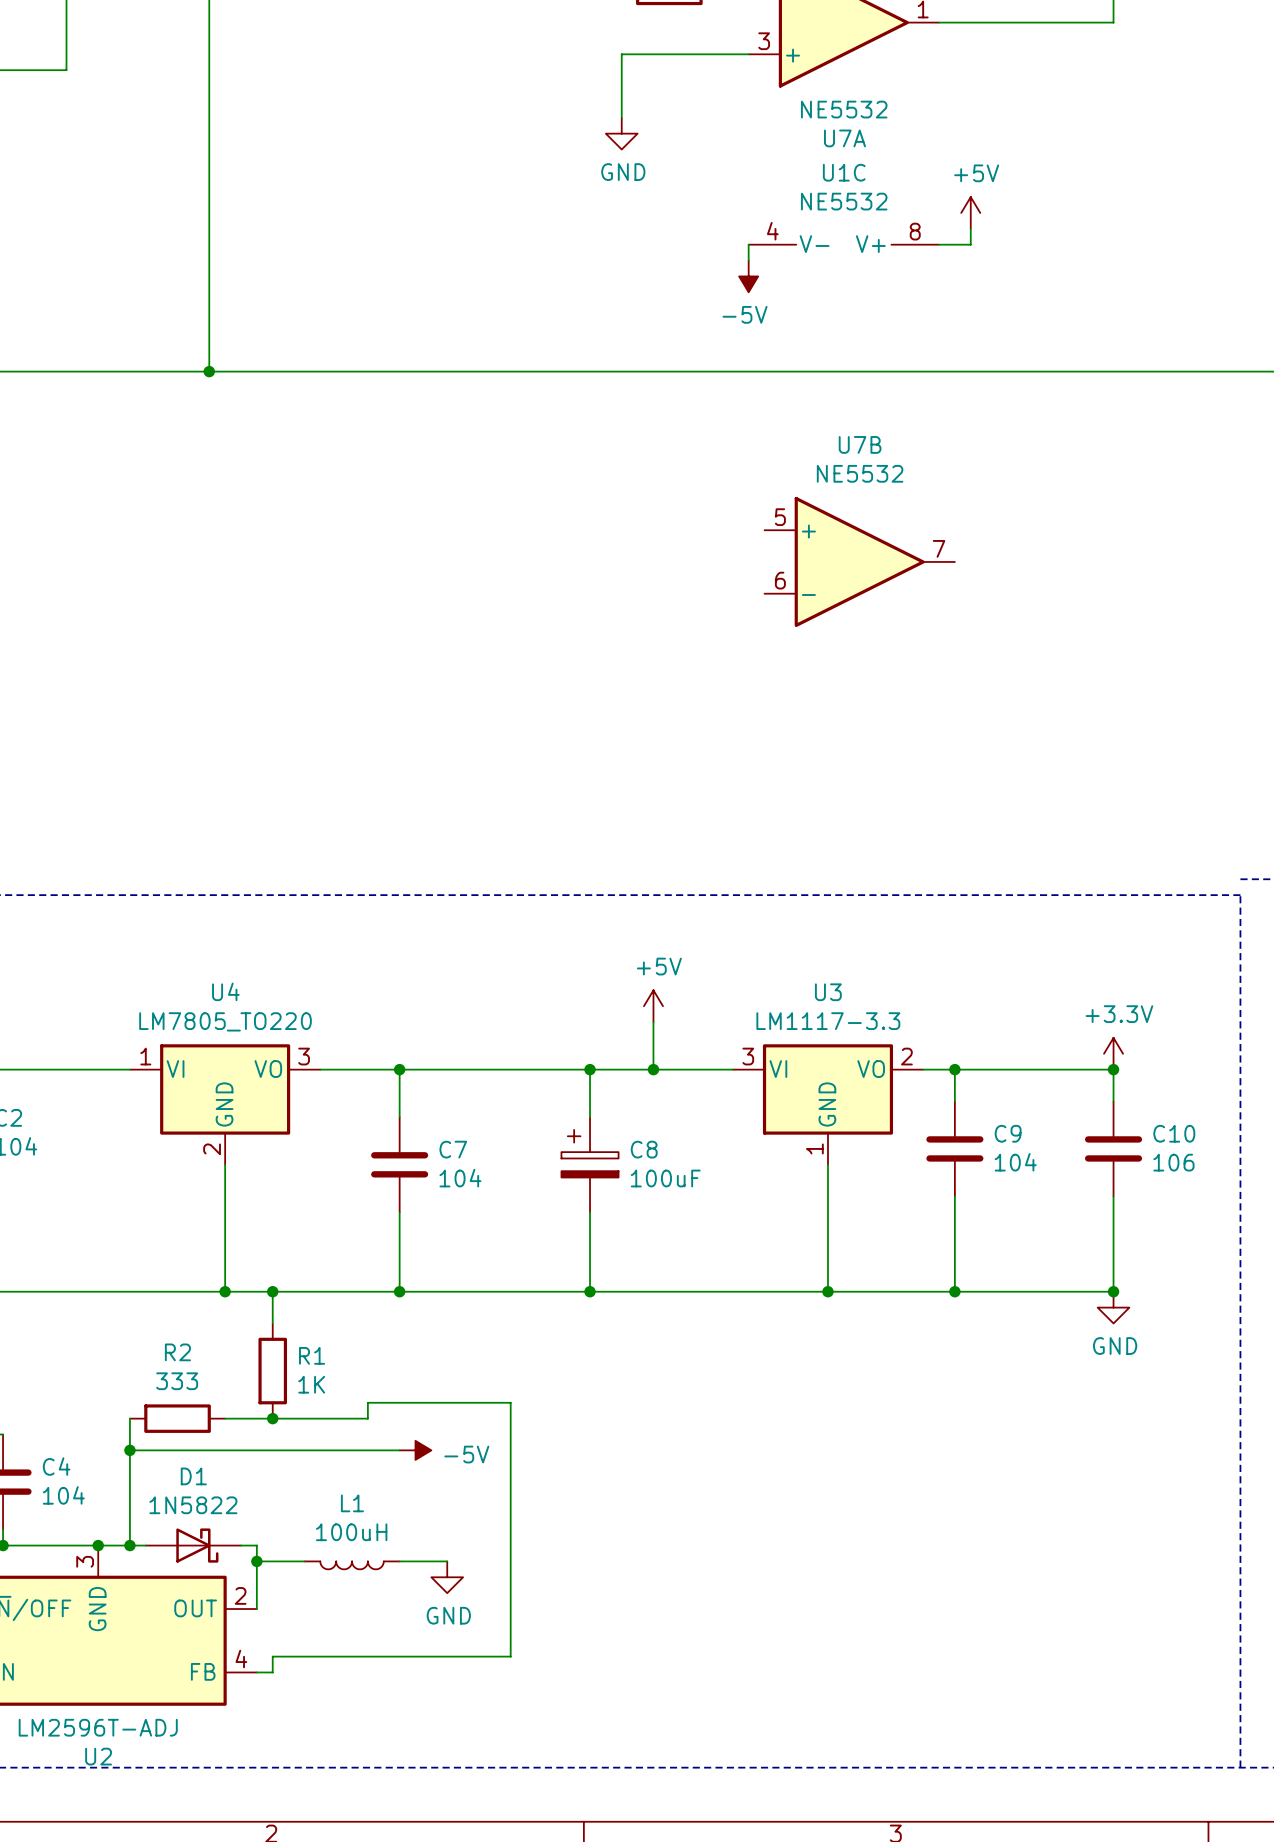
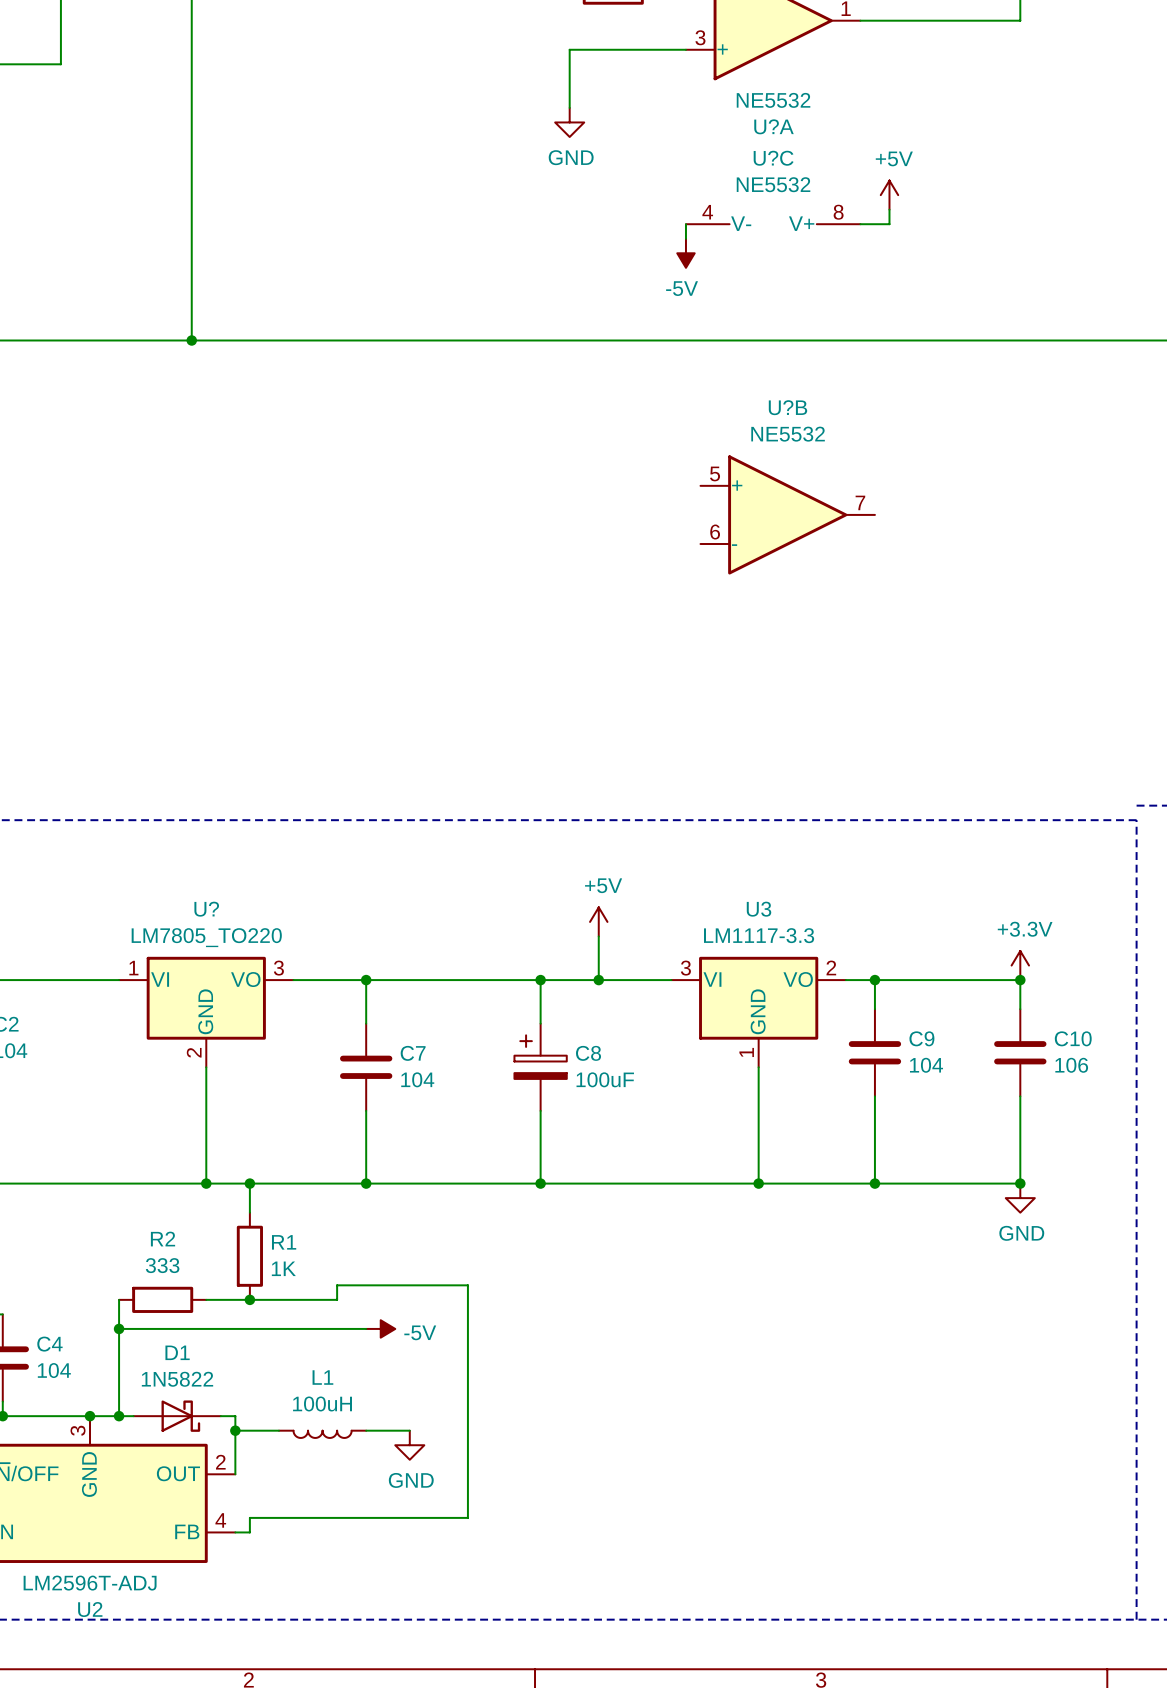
U7A name: U7A (844, 138) -> U?A (773, 126)
U1C name: U1C (844, 172) -> U?C (773, 158)
U7B name: U7B (860, 444) -> U?B (787, 407)
U4 name: U4 (225, 991) -> U? (206, 909)

